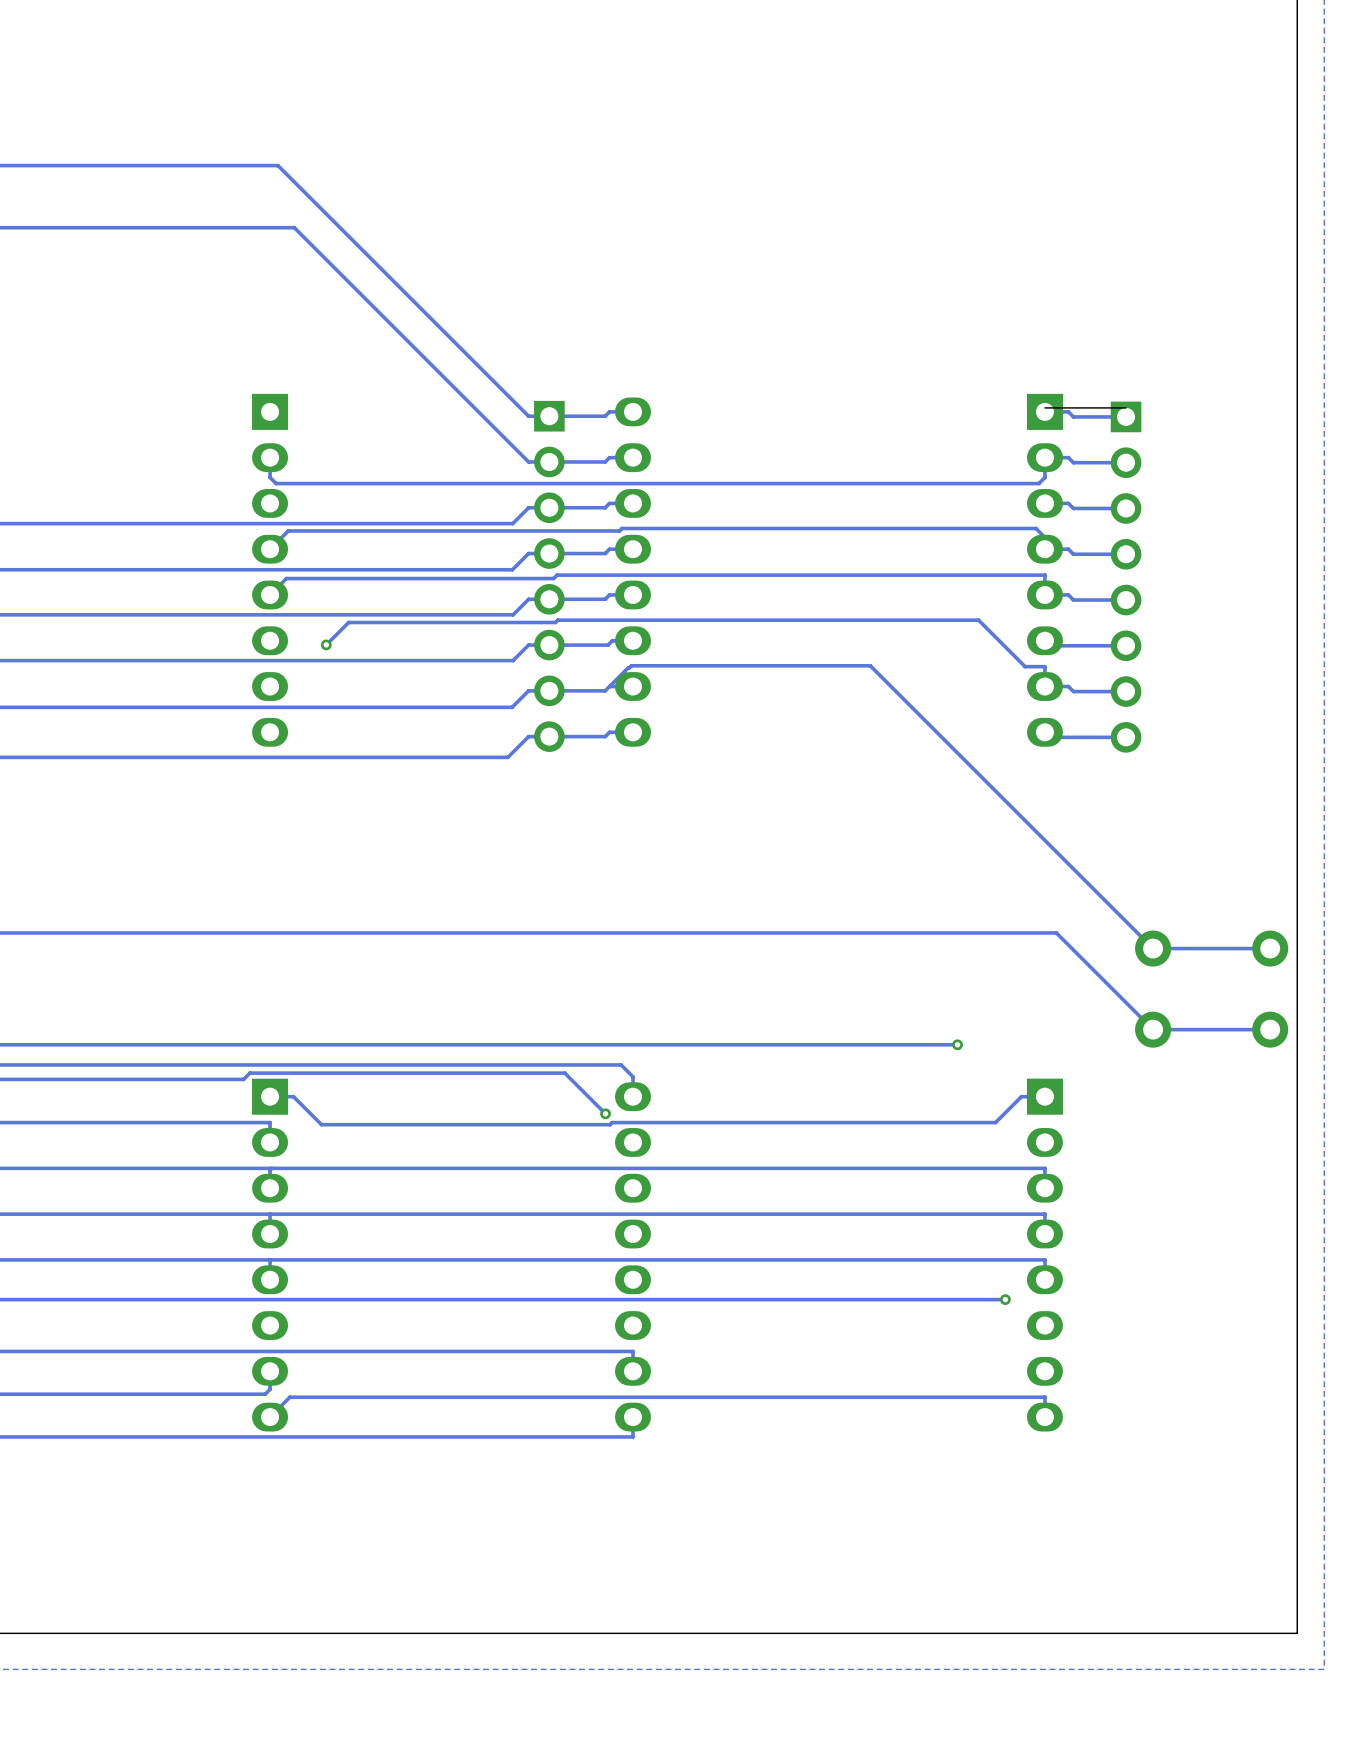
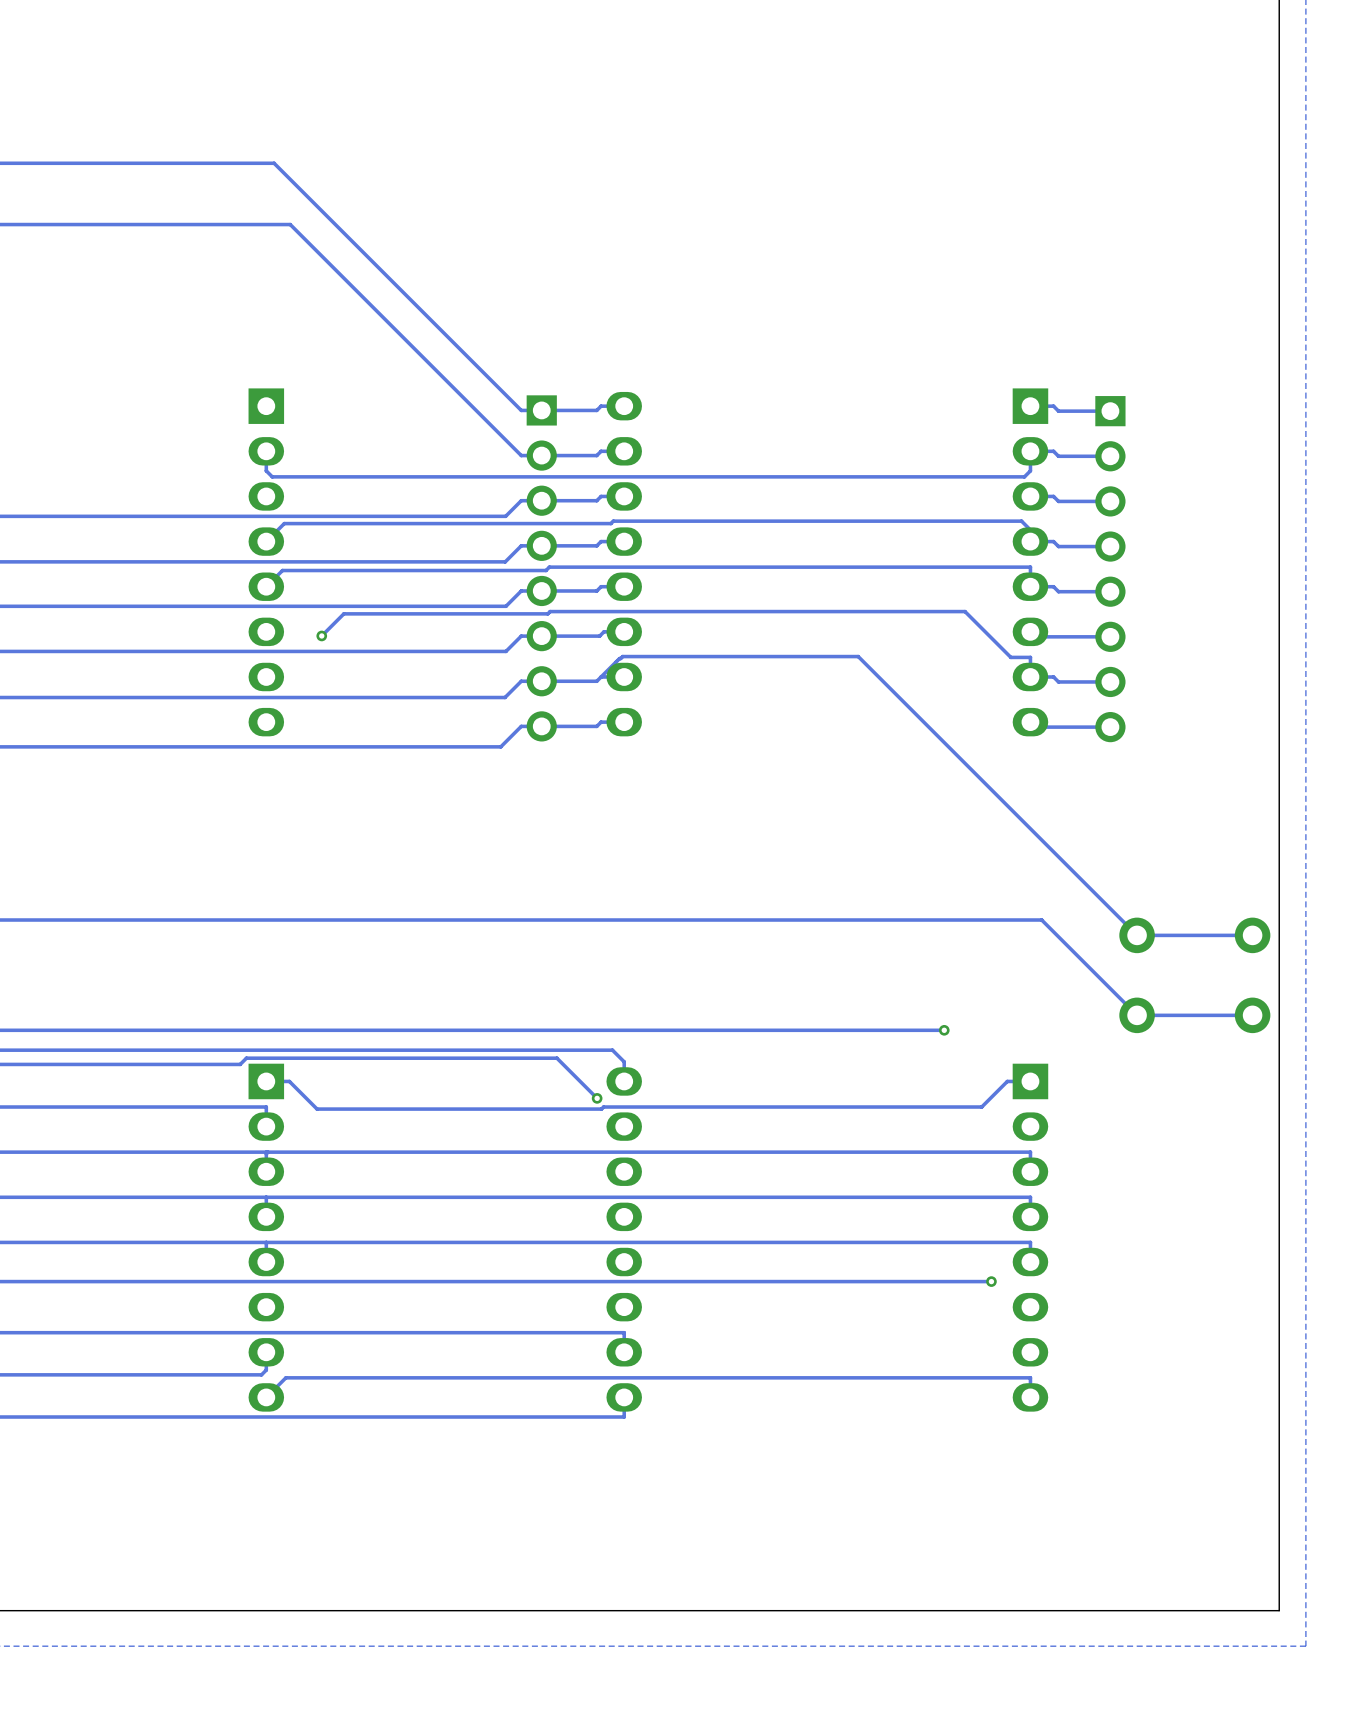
board edge: (1126, 407) (1044, 407) -> none

